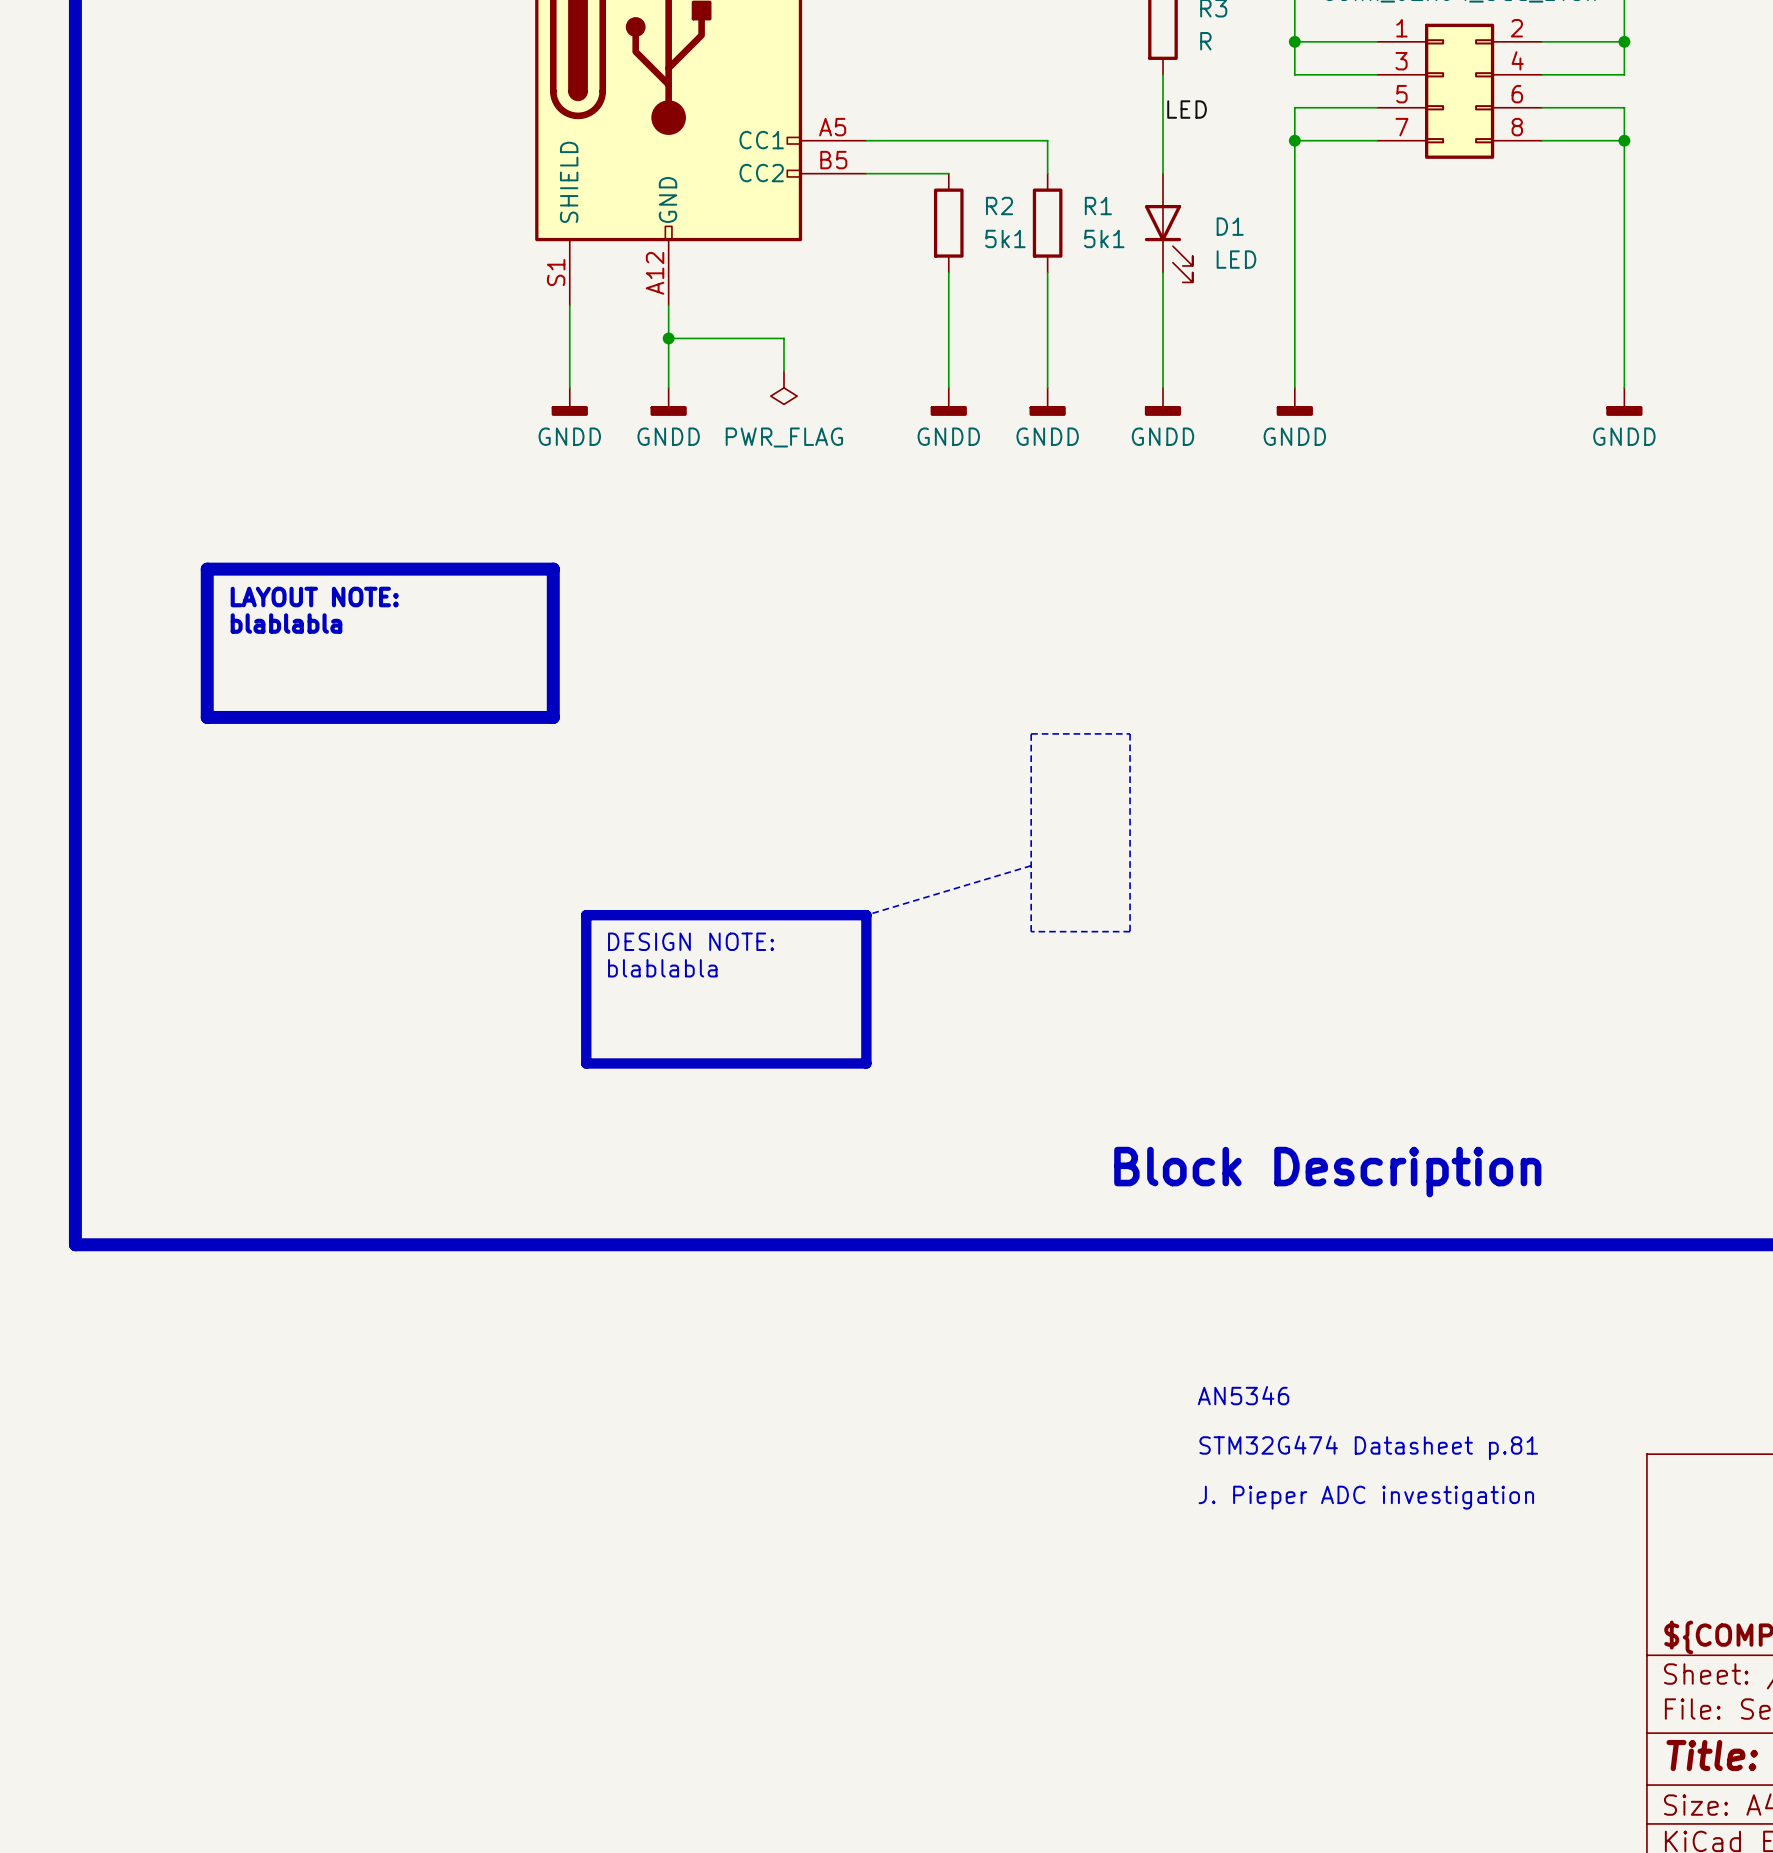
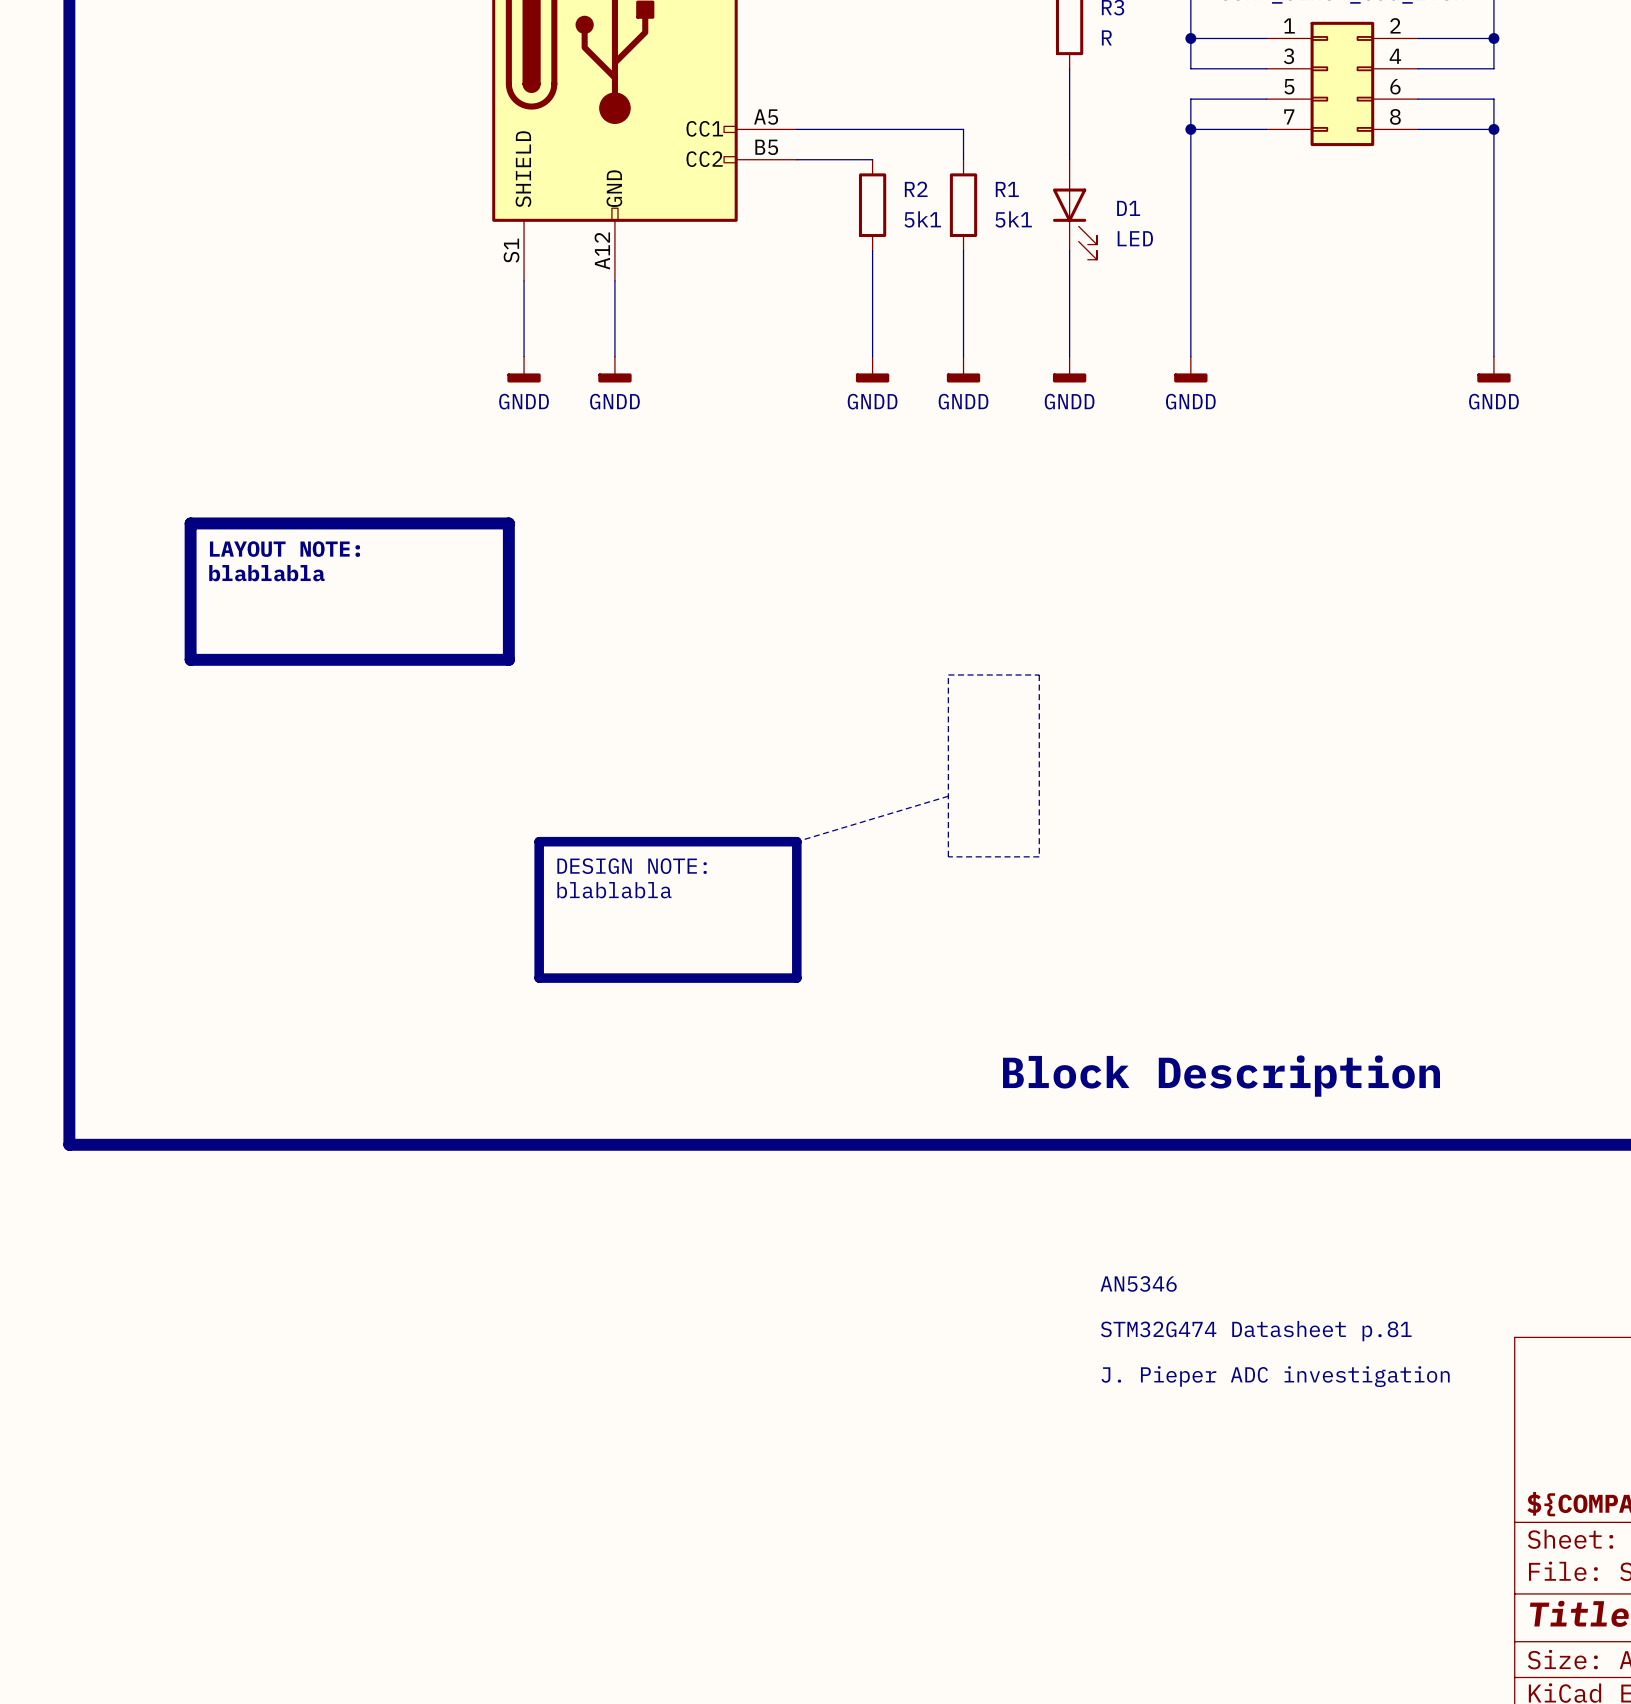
label: LED (1187, 109) -> none
wire: (668, 338) (783, 338) (783, 371) -> none
junction: (668, 338) -> none
power symbol: PWR_FLAG (783, 387) -> none

